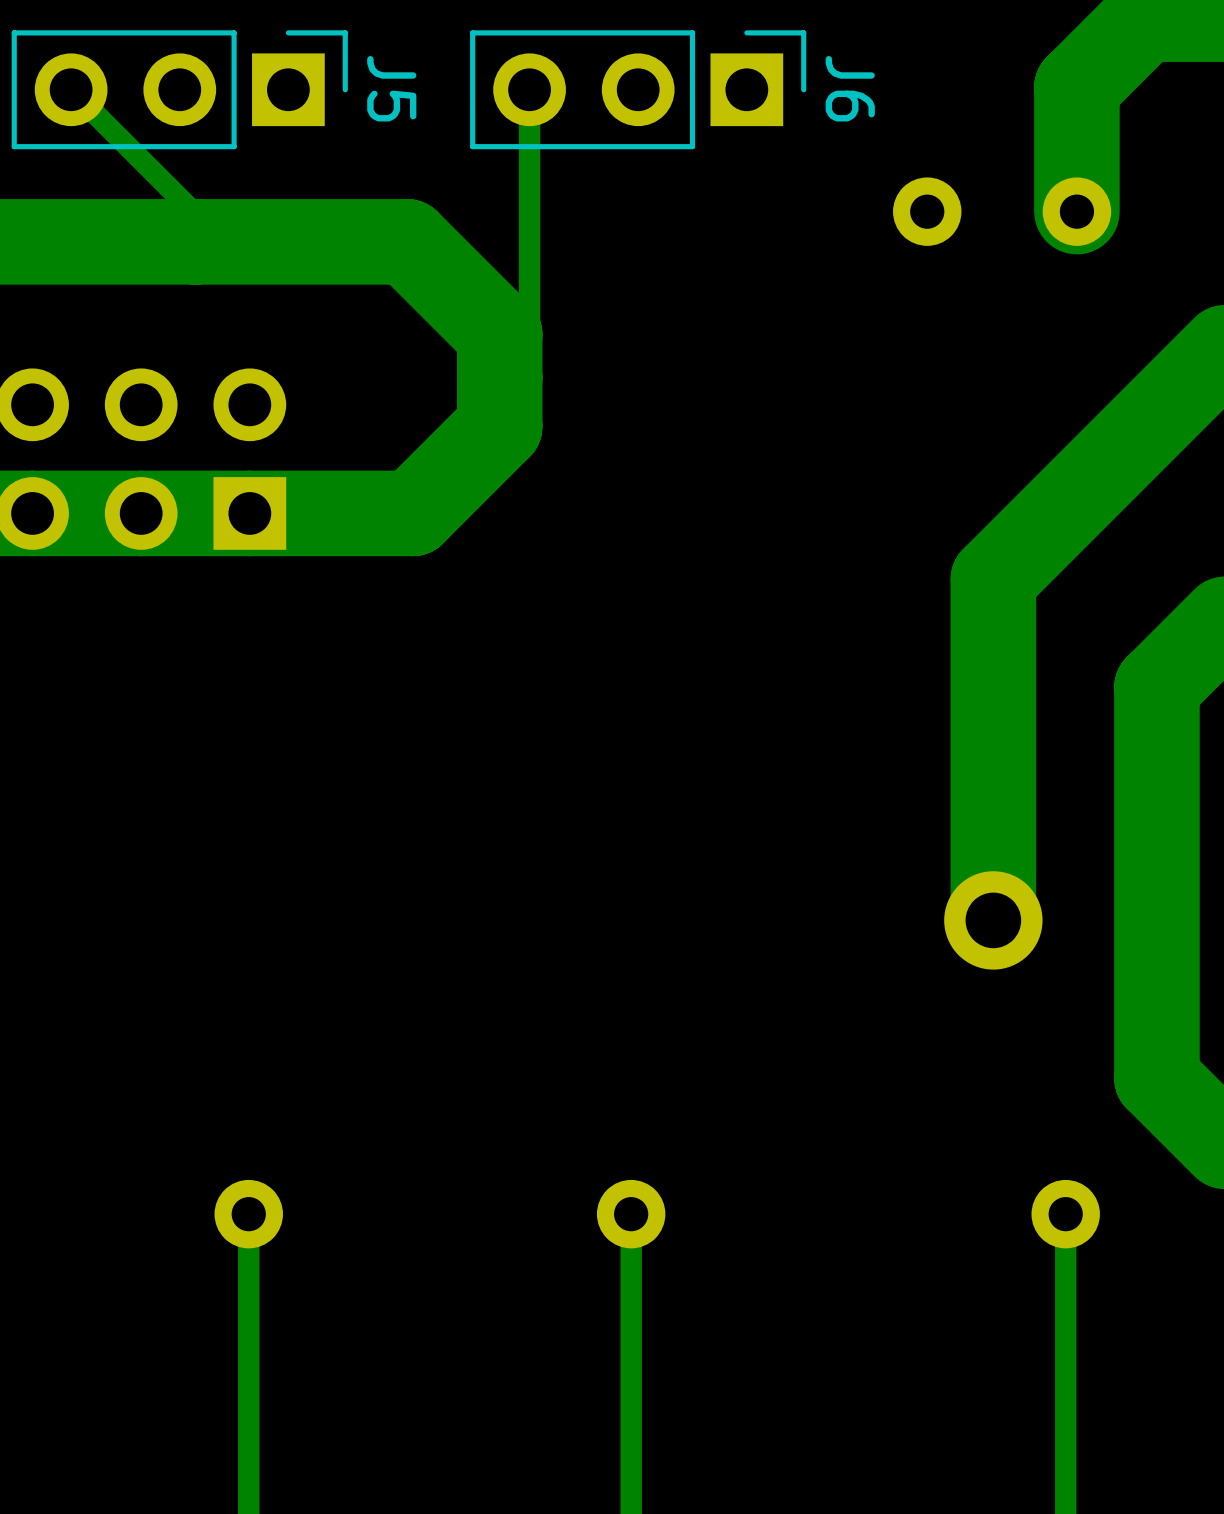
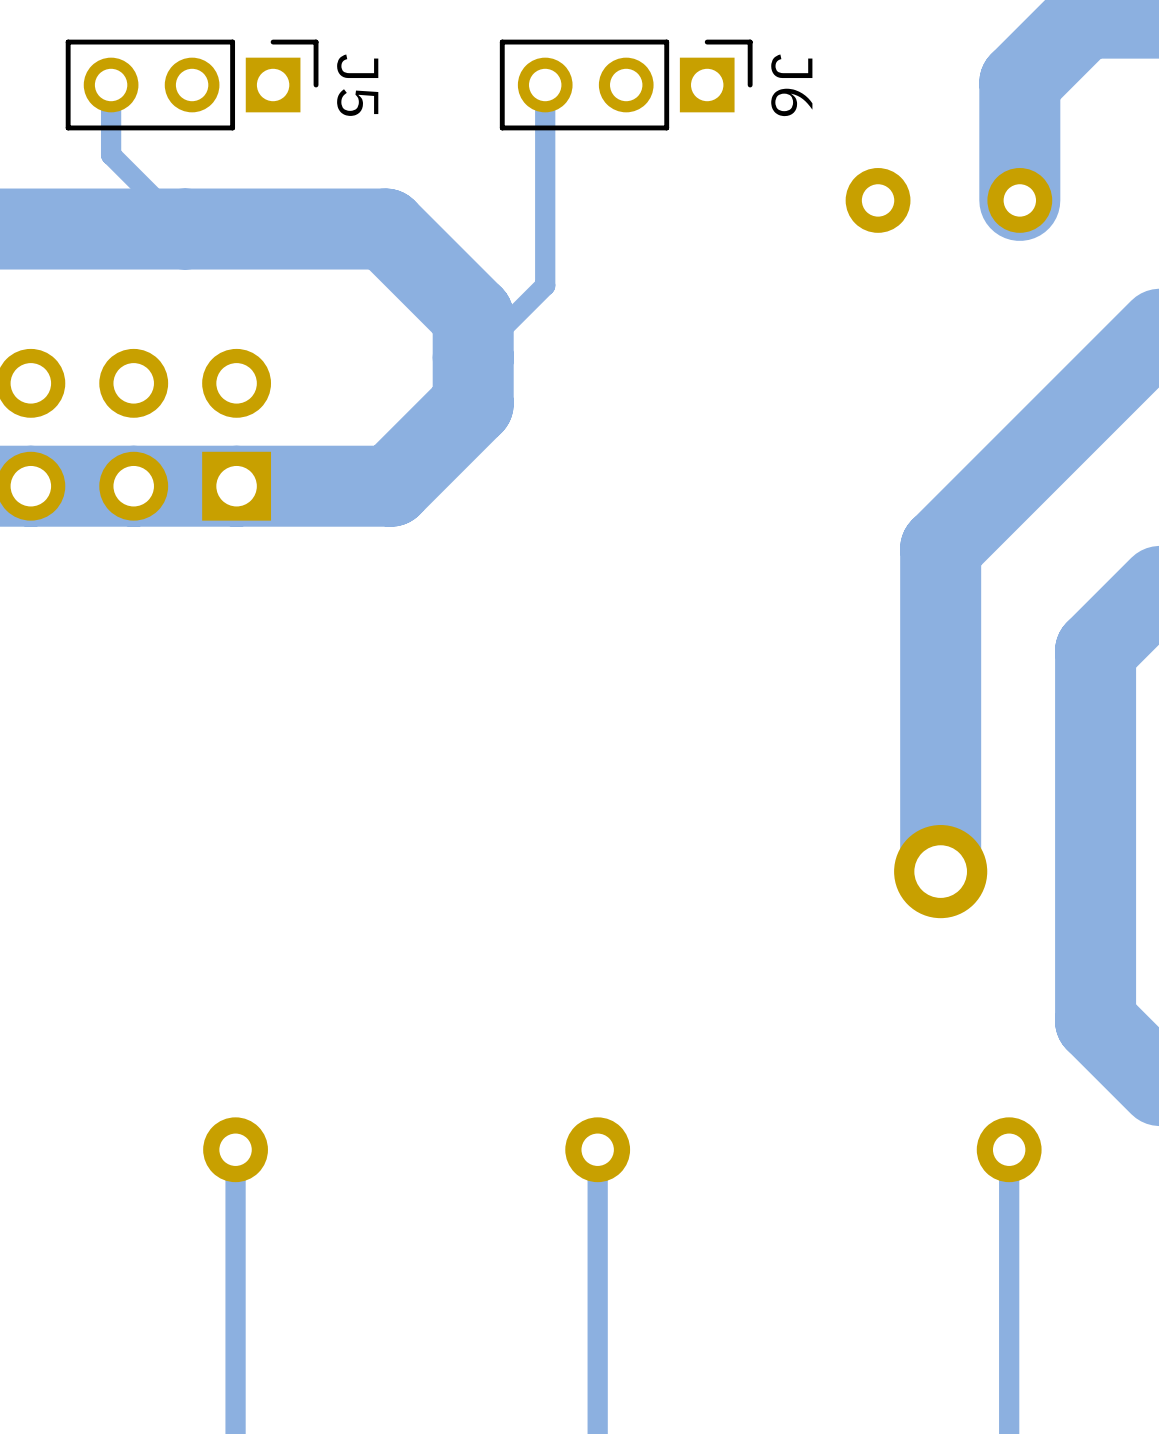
J5 footprint: [11, 30, 348, 150] -> [65, 39, 319, 131]
J6 footprint: [470, 30, 807, 150] -> [499, 39, 753, 131]
track: (71, 89) (195, 214) (195, 241) -> (111, 85) (111, 154) (185, 229)
track: (529, 89) (529, 347) -> (545, 85) (545, 285) (501, 329)

